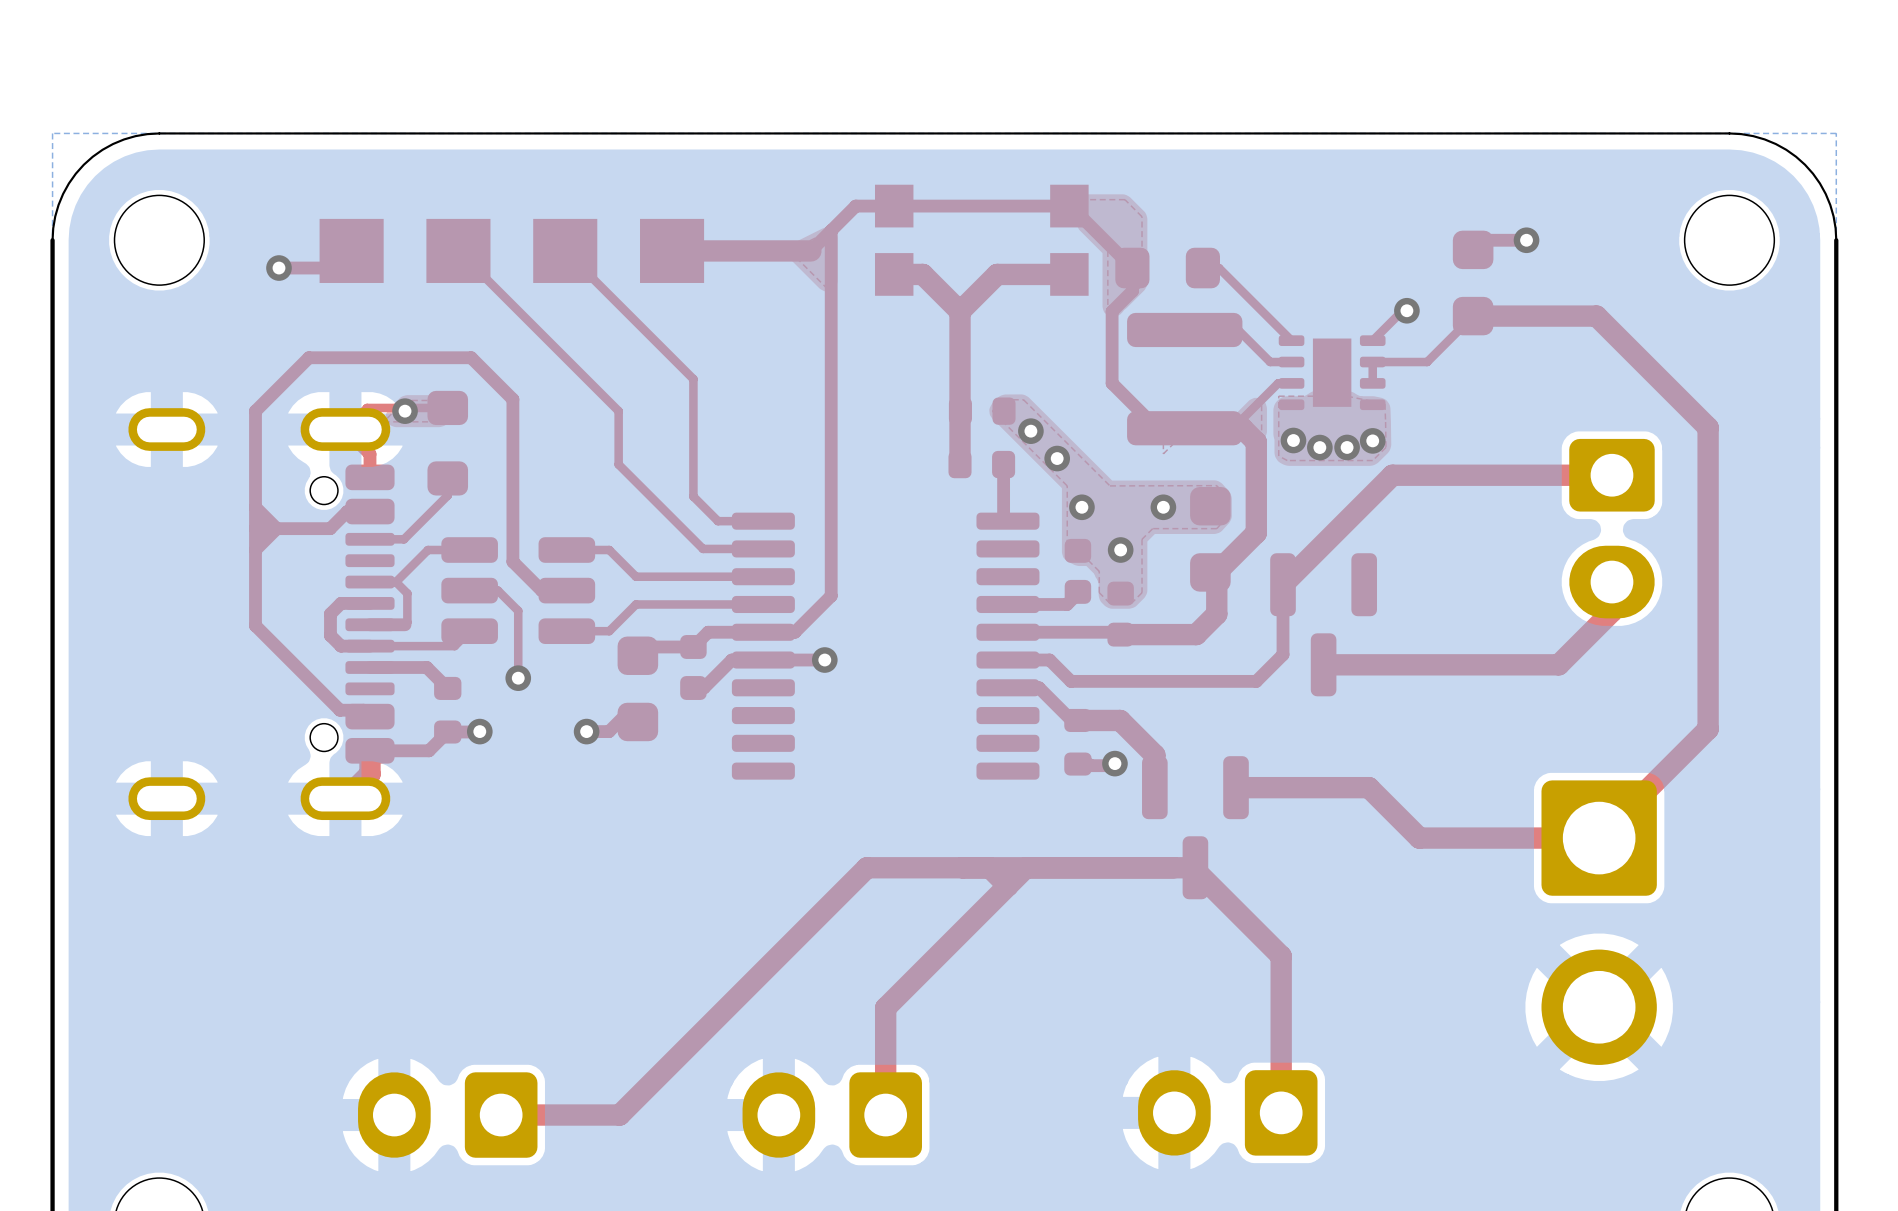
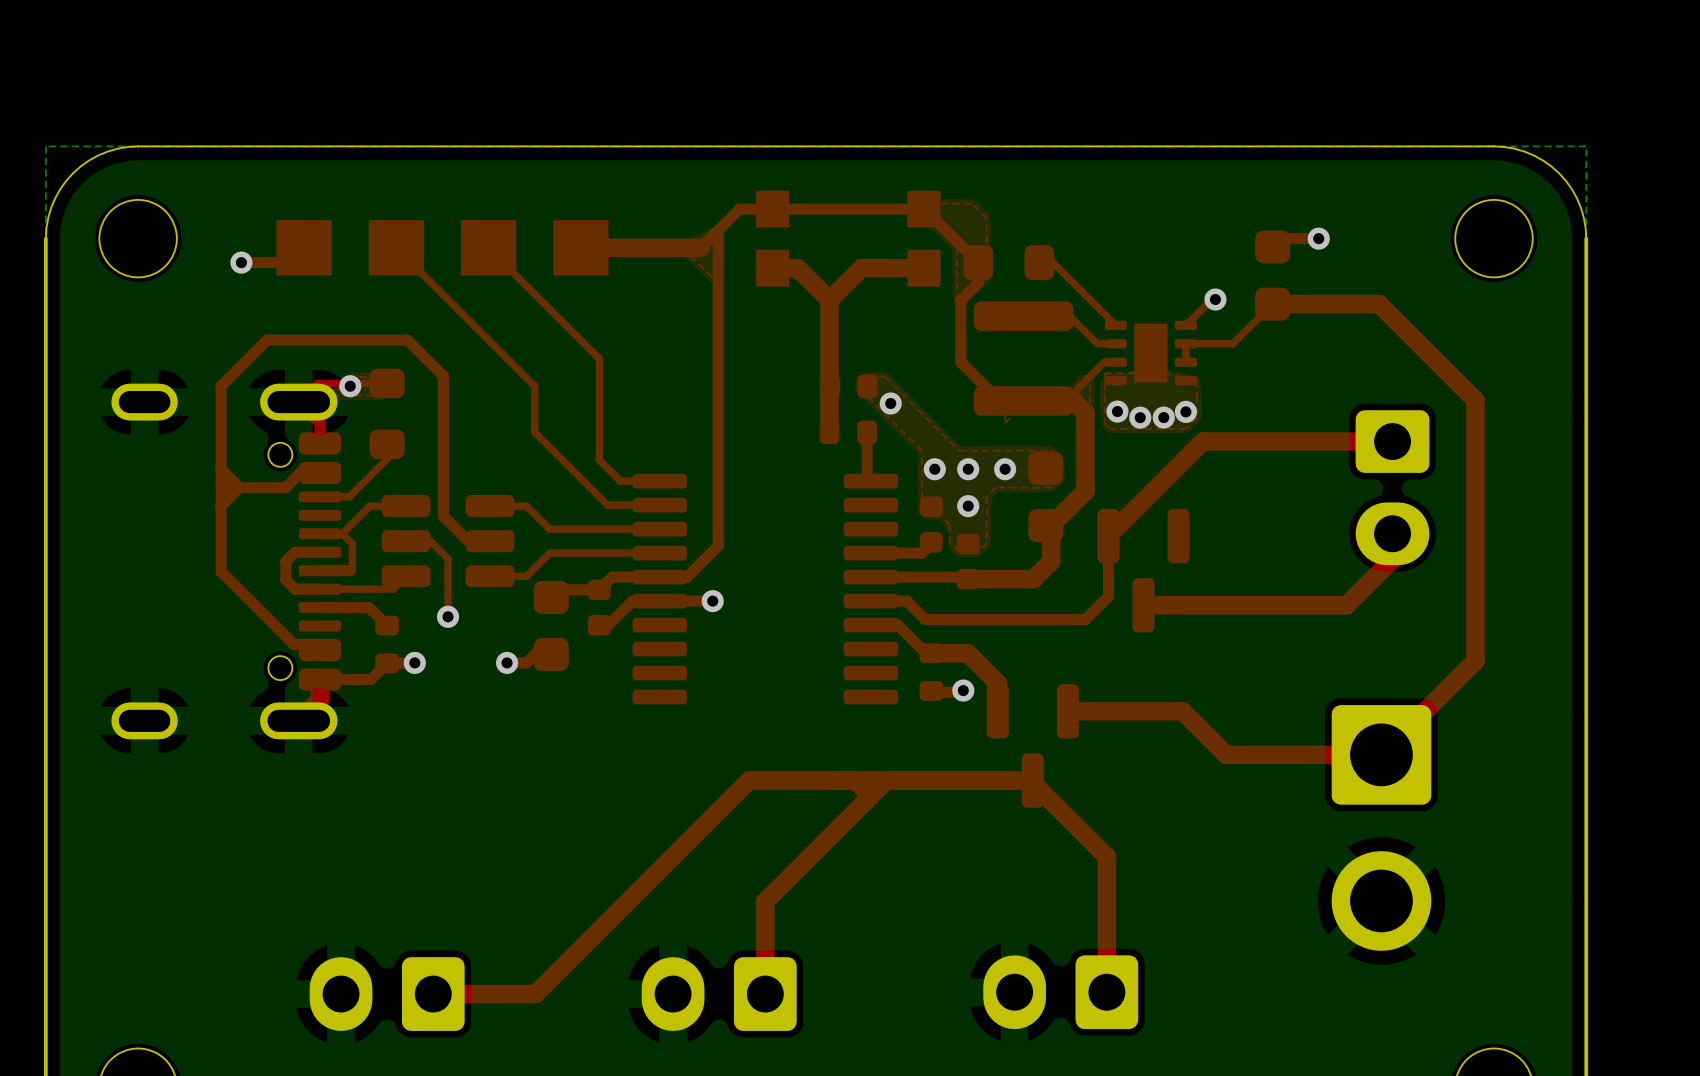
via position: (1057, 458) -> (968, 469)

